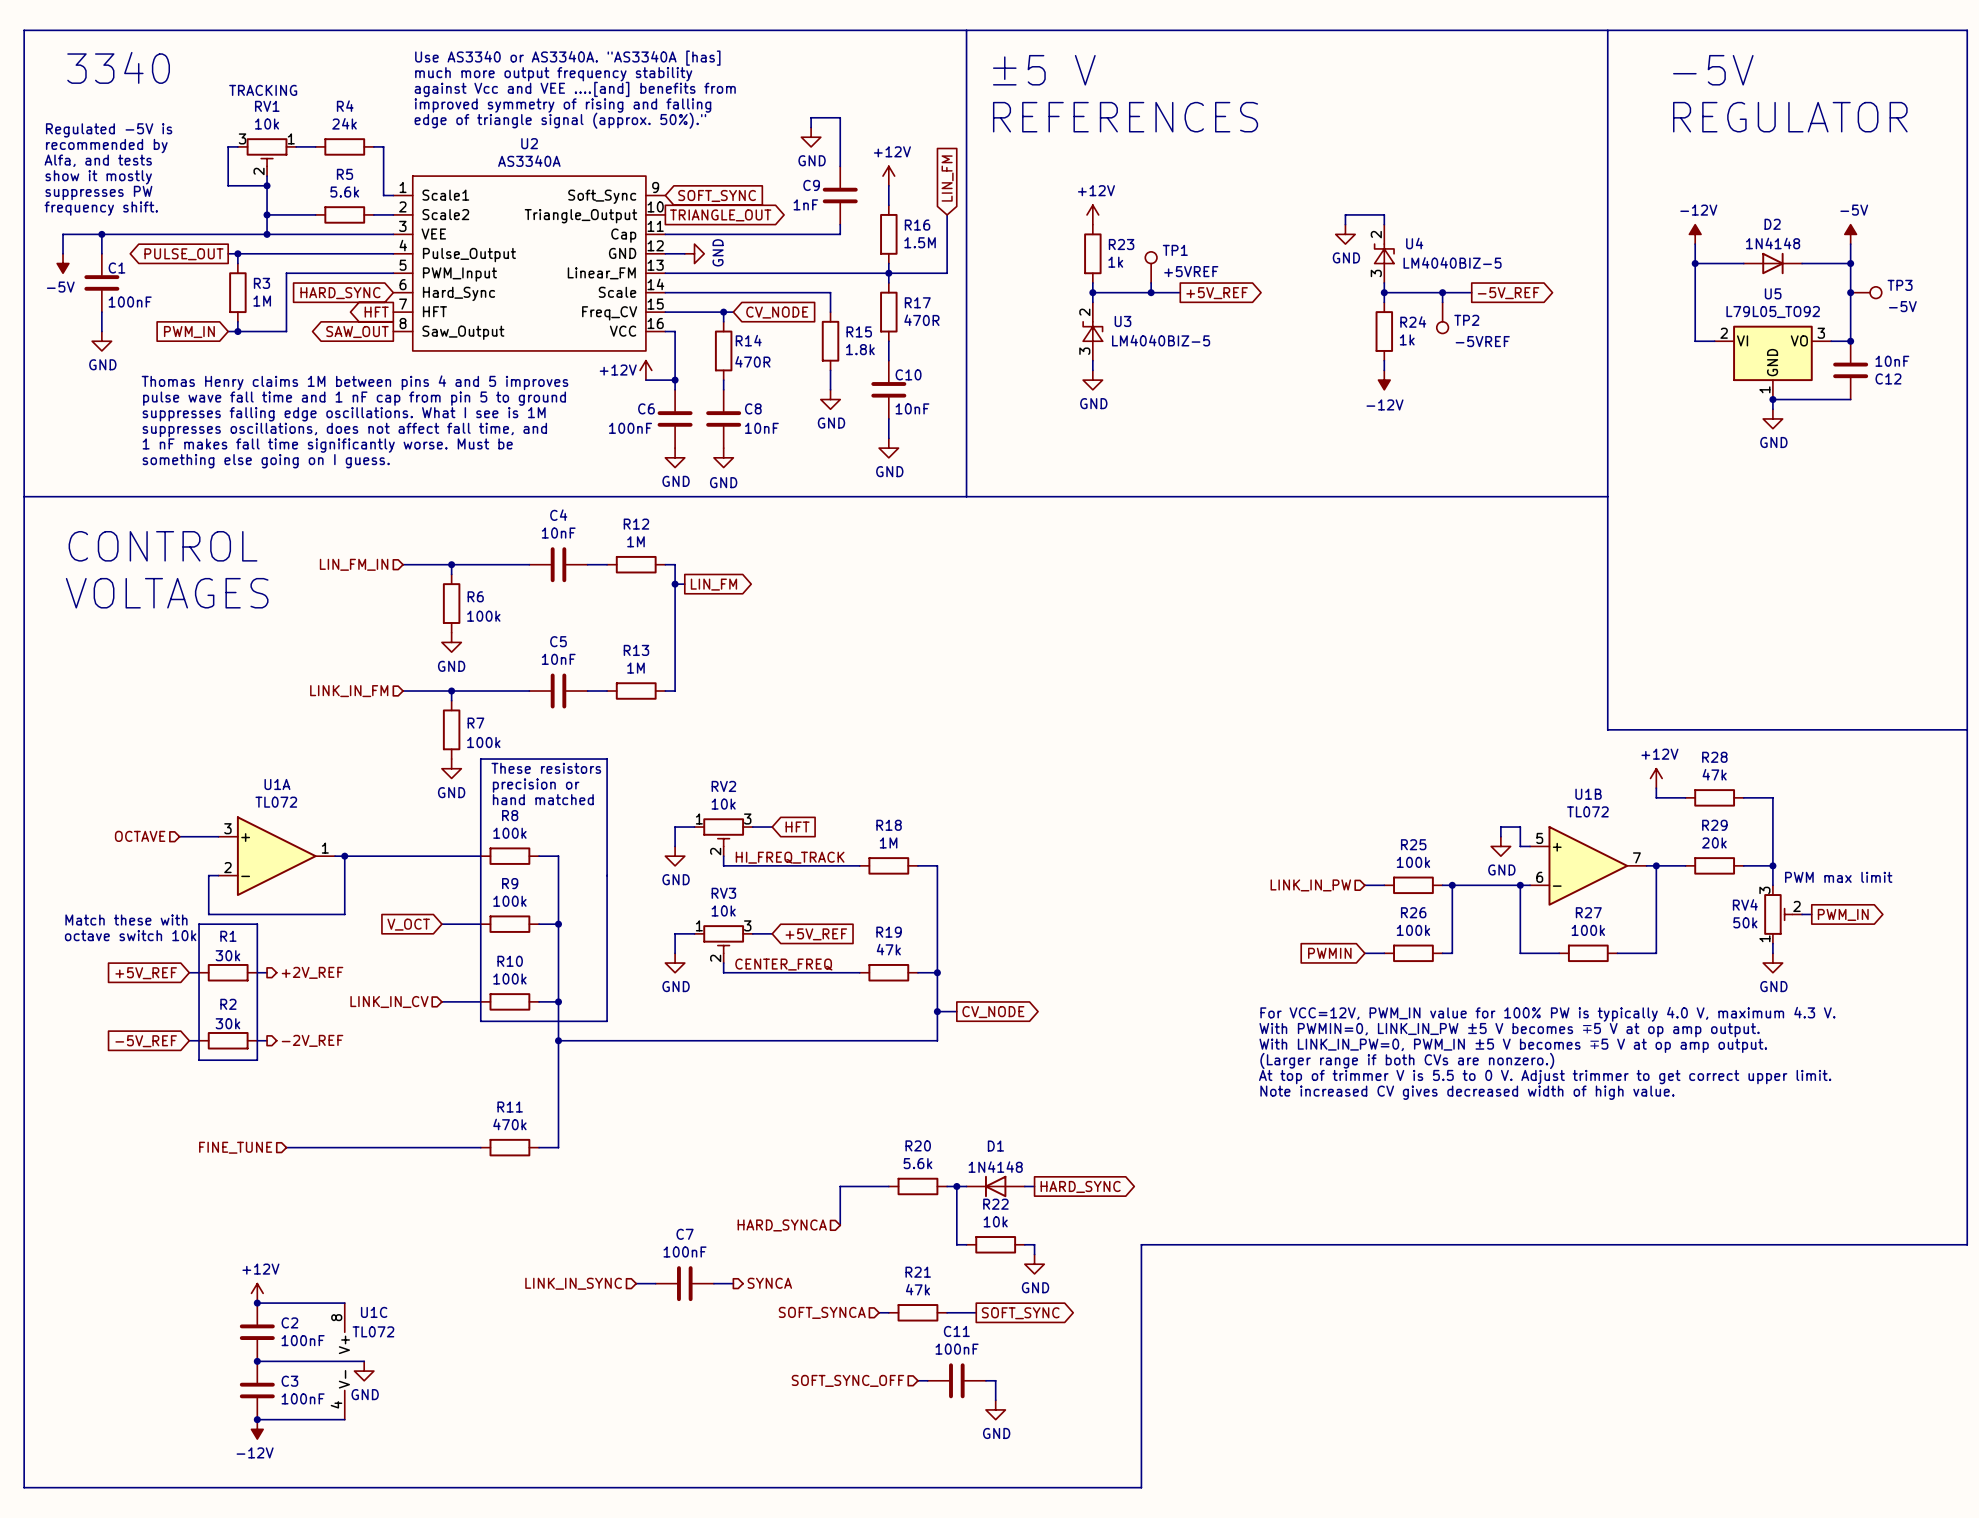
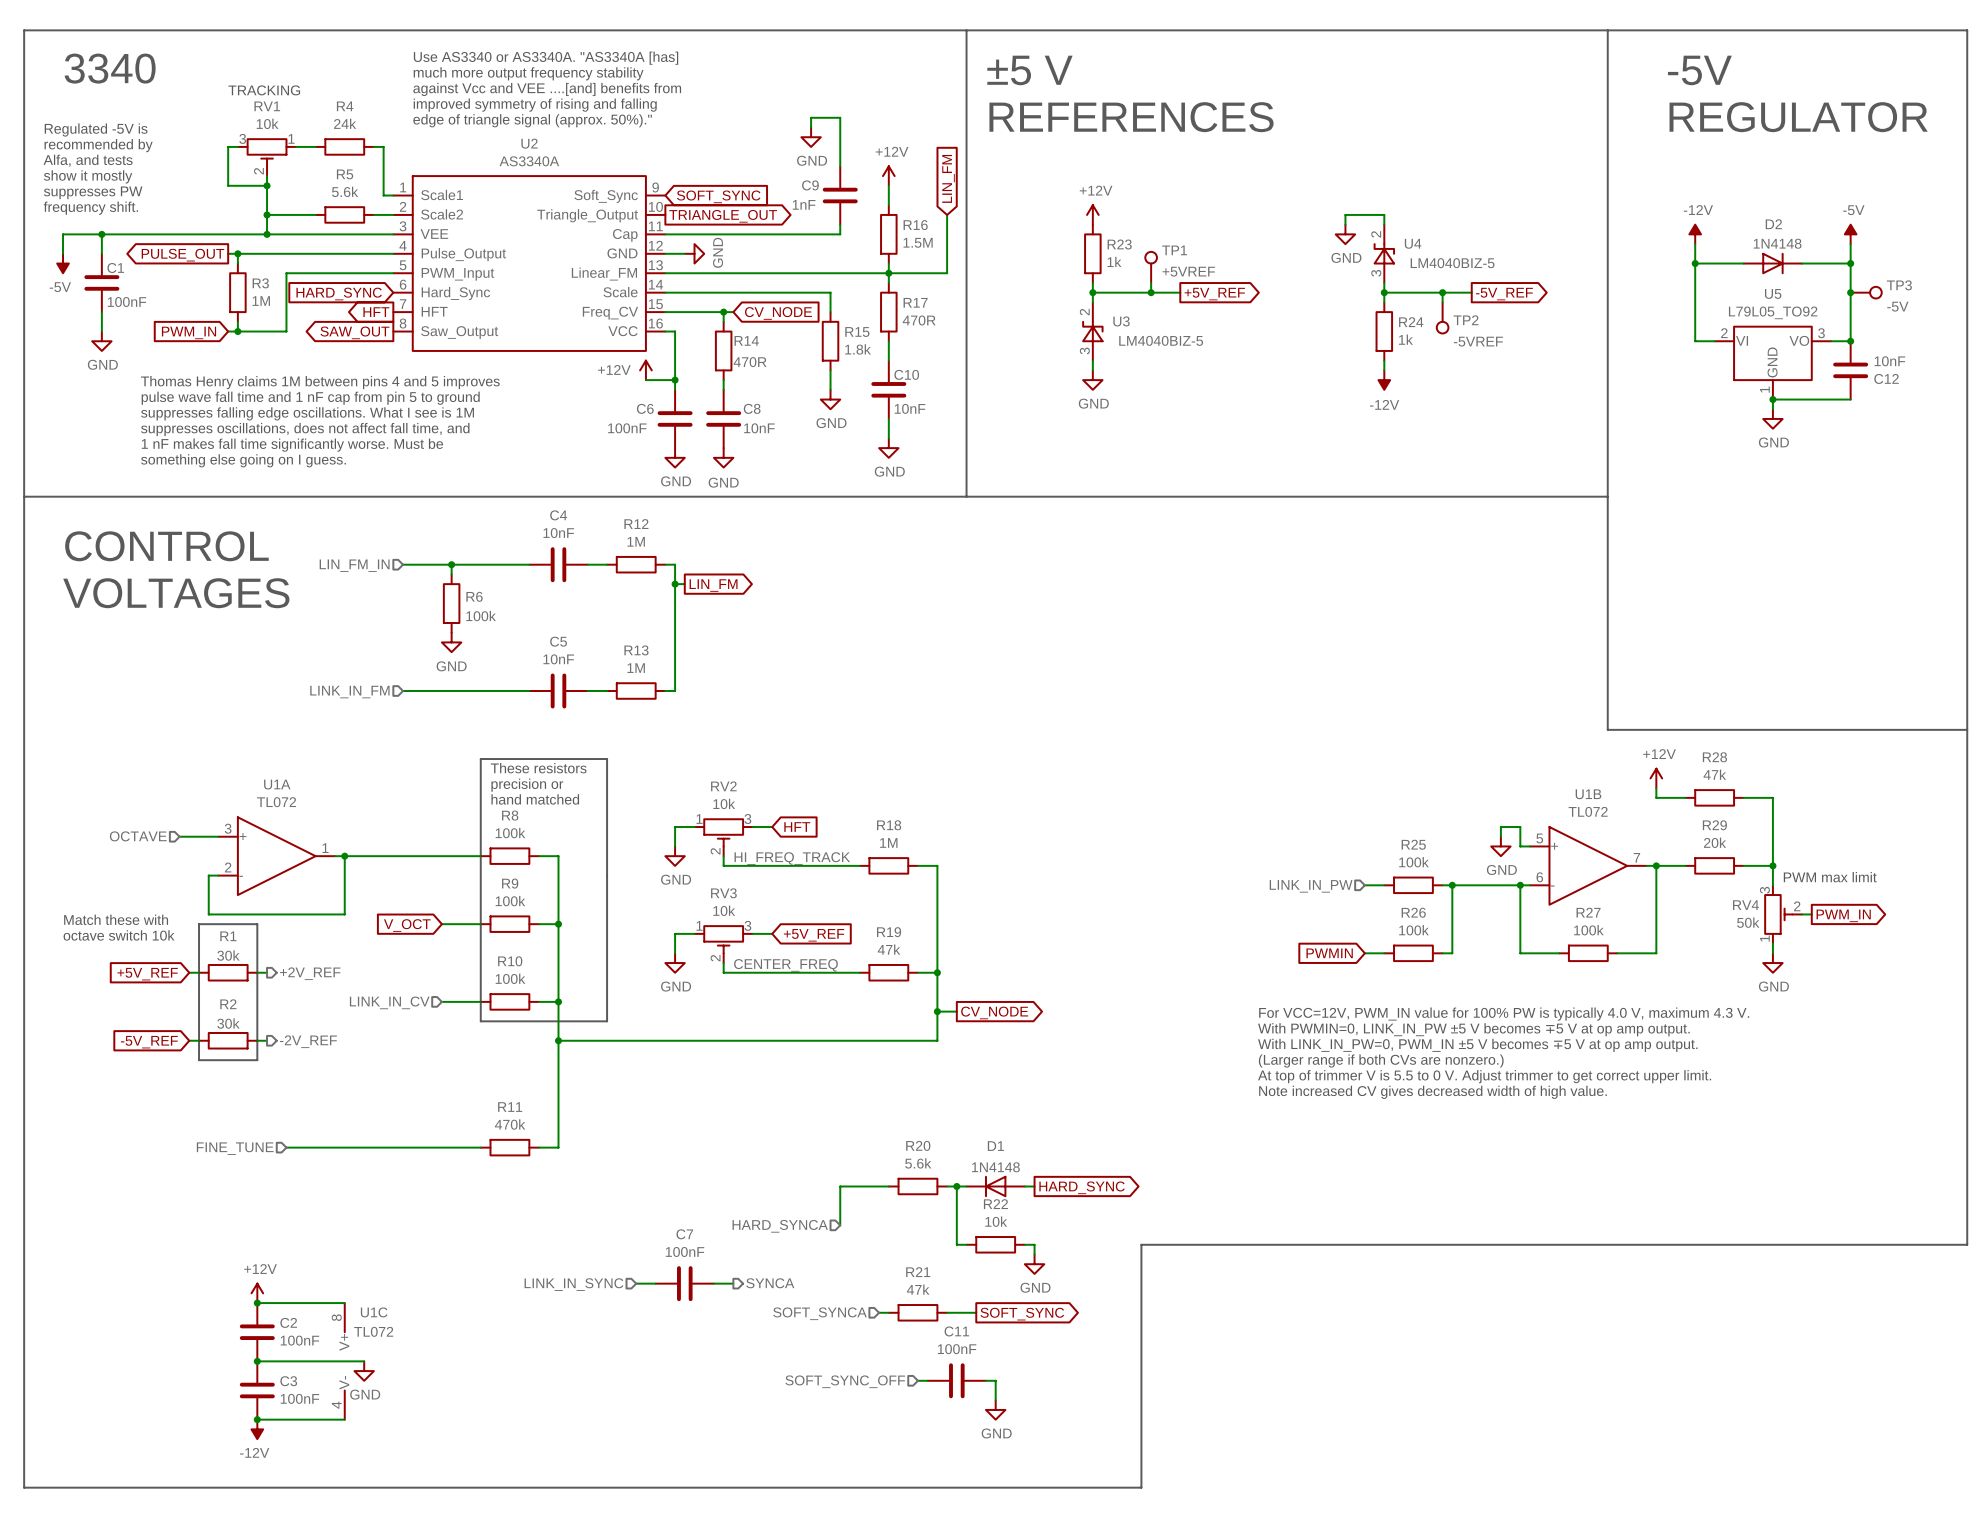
wire: (451, 691) (451, 700) -> none
junction: (451, 691) -> none
R7: 100k (451, 729) -> none
power symbol: GND (451, 768) -> none

